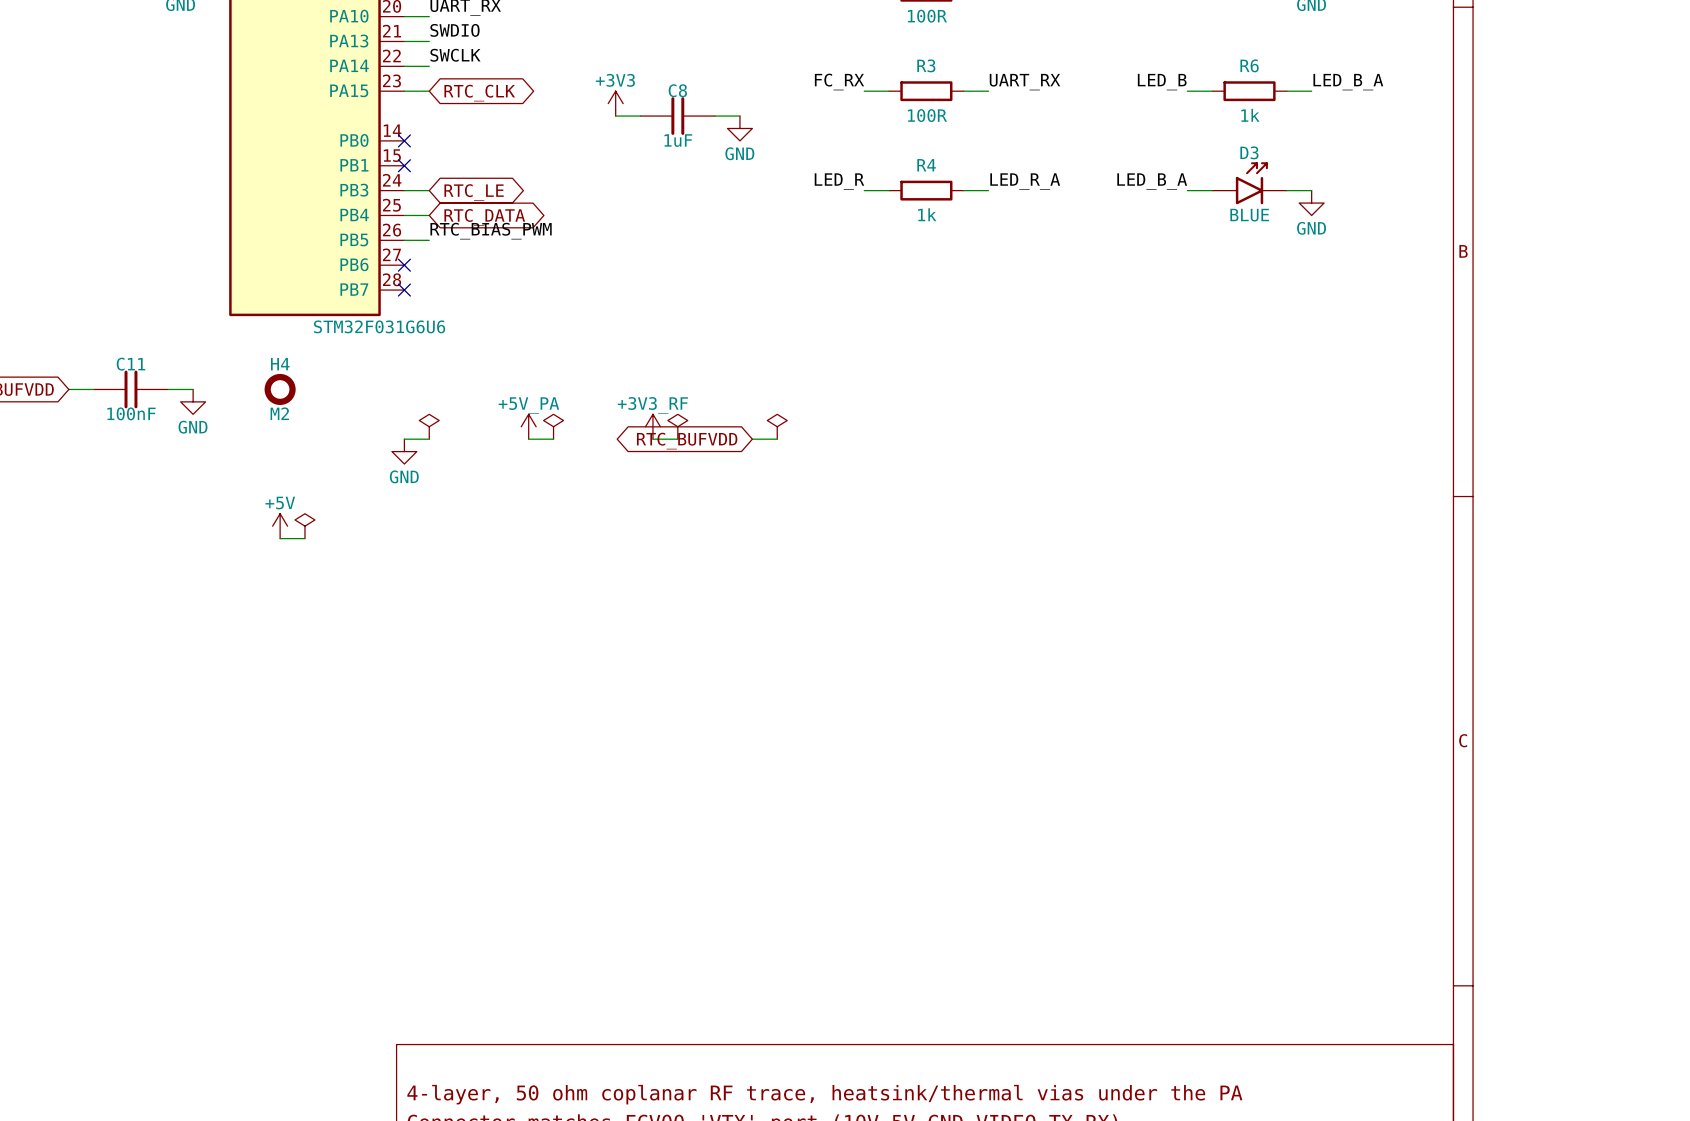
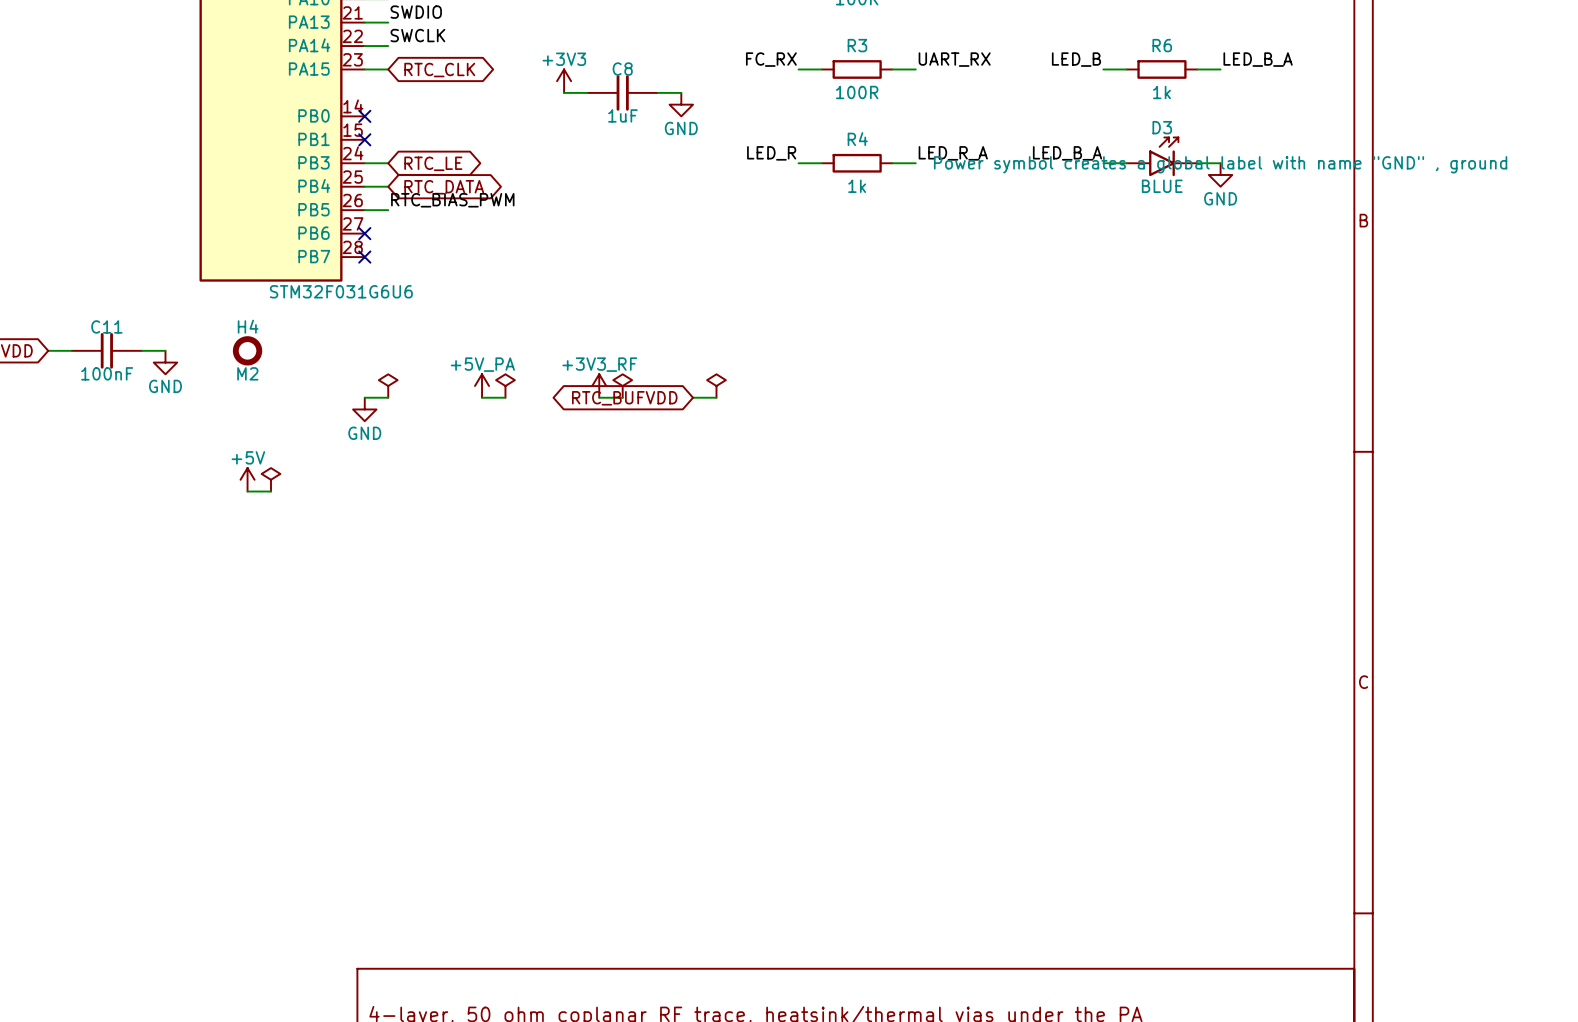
power symbol text: none -> Power symbol creates a global label with name "GND" , ground (1220, 164)

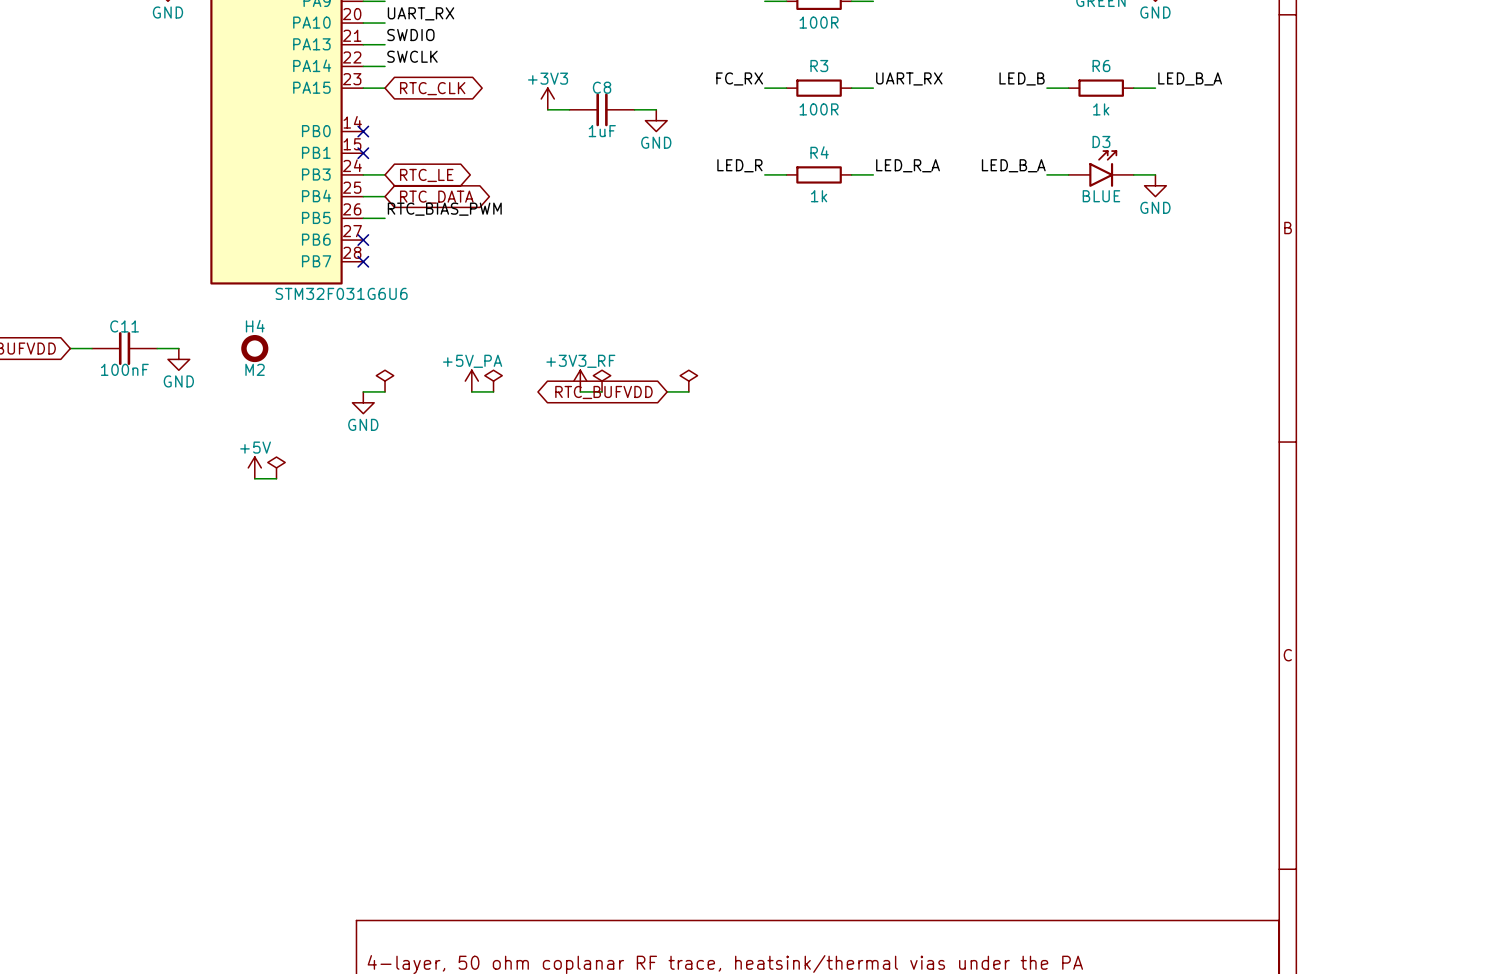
power symbol text: Power symbol creates a global label with name "GND" , ground (1220, 164) -> none

